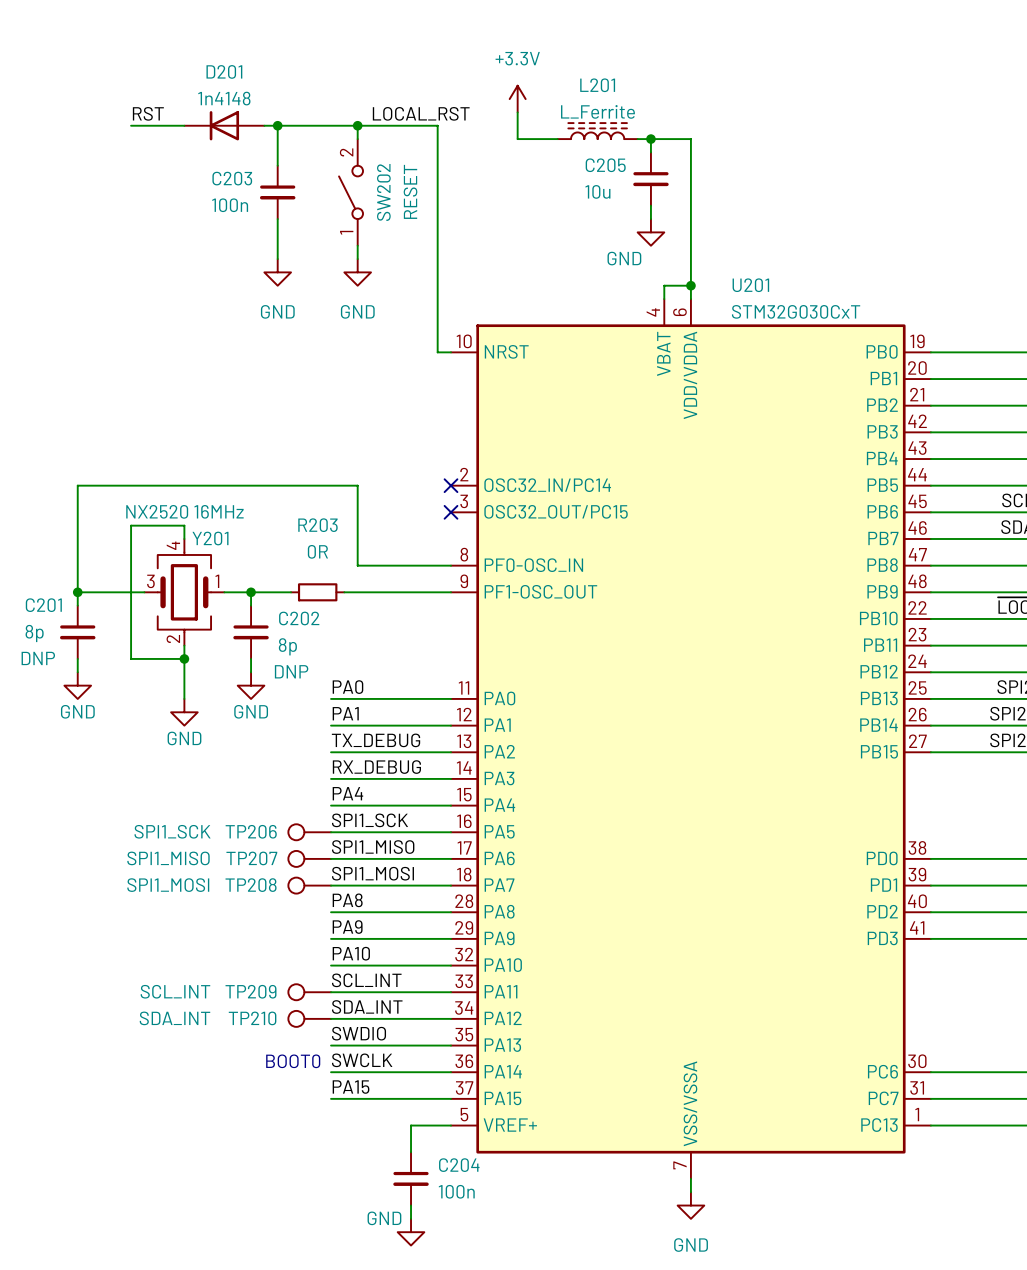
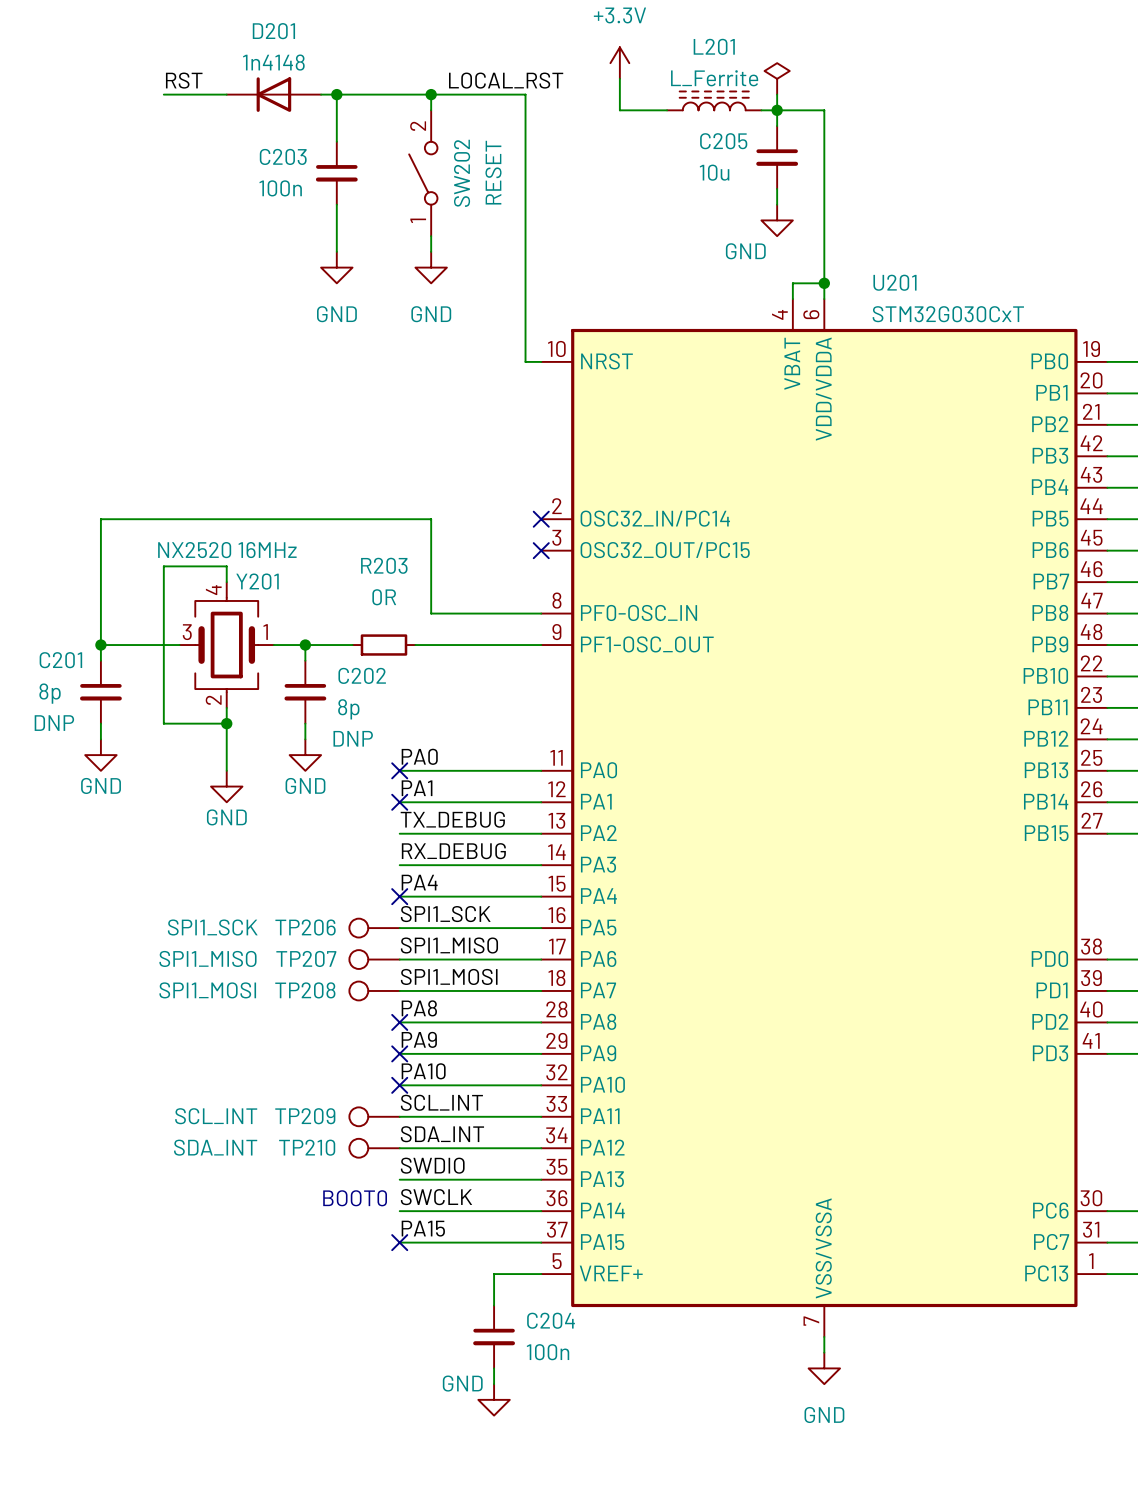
power symbol: none -> (777, 78)
wire: none -> (777, 94) (777, 110)
no-connect mark: none -> (399, 770)
no-connect mark: none -> (399, 802)
no-connect mark: none -> (399, 896)
no-connect mark: none -> (399, 1022)
no-connect mark: none -> (399, 1053)
no-connect mark: none -> (399, 1085)
no-connect mark: none -> (399, 1242)

